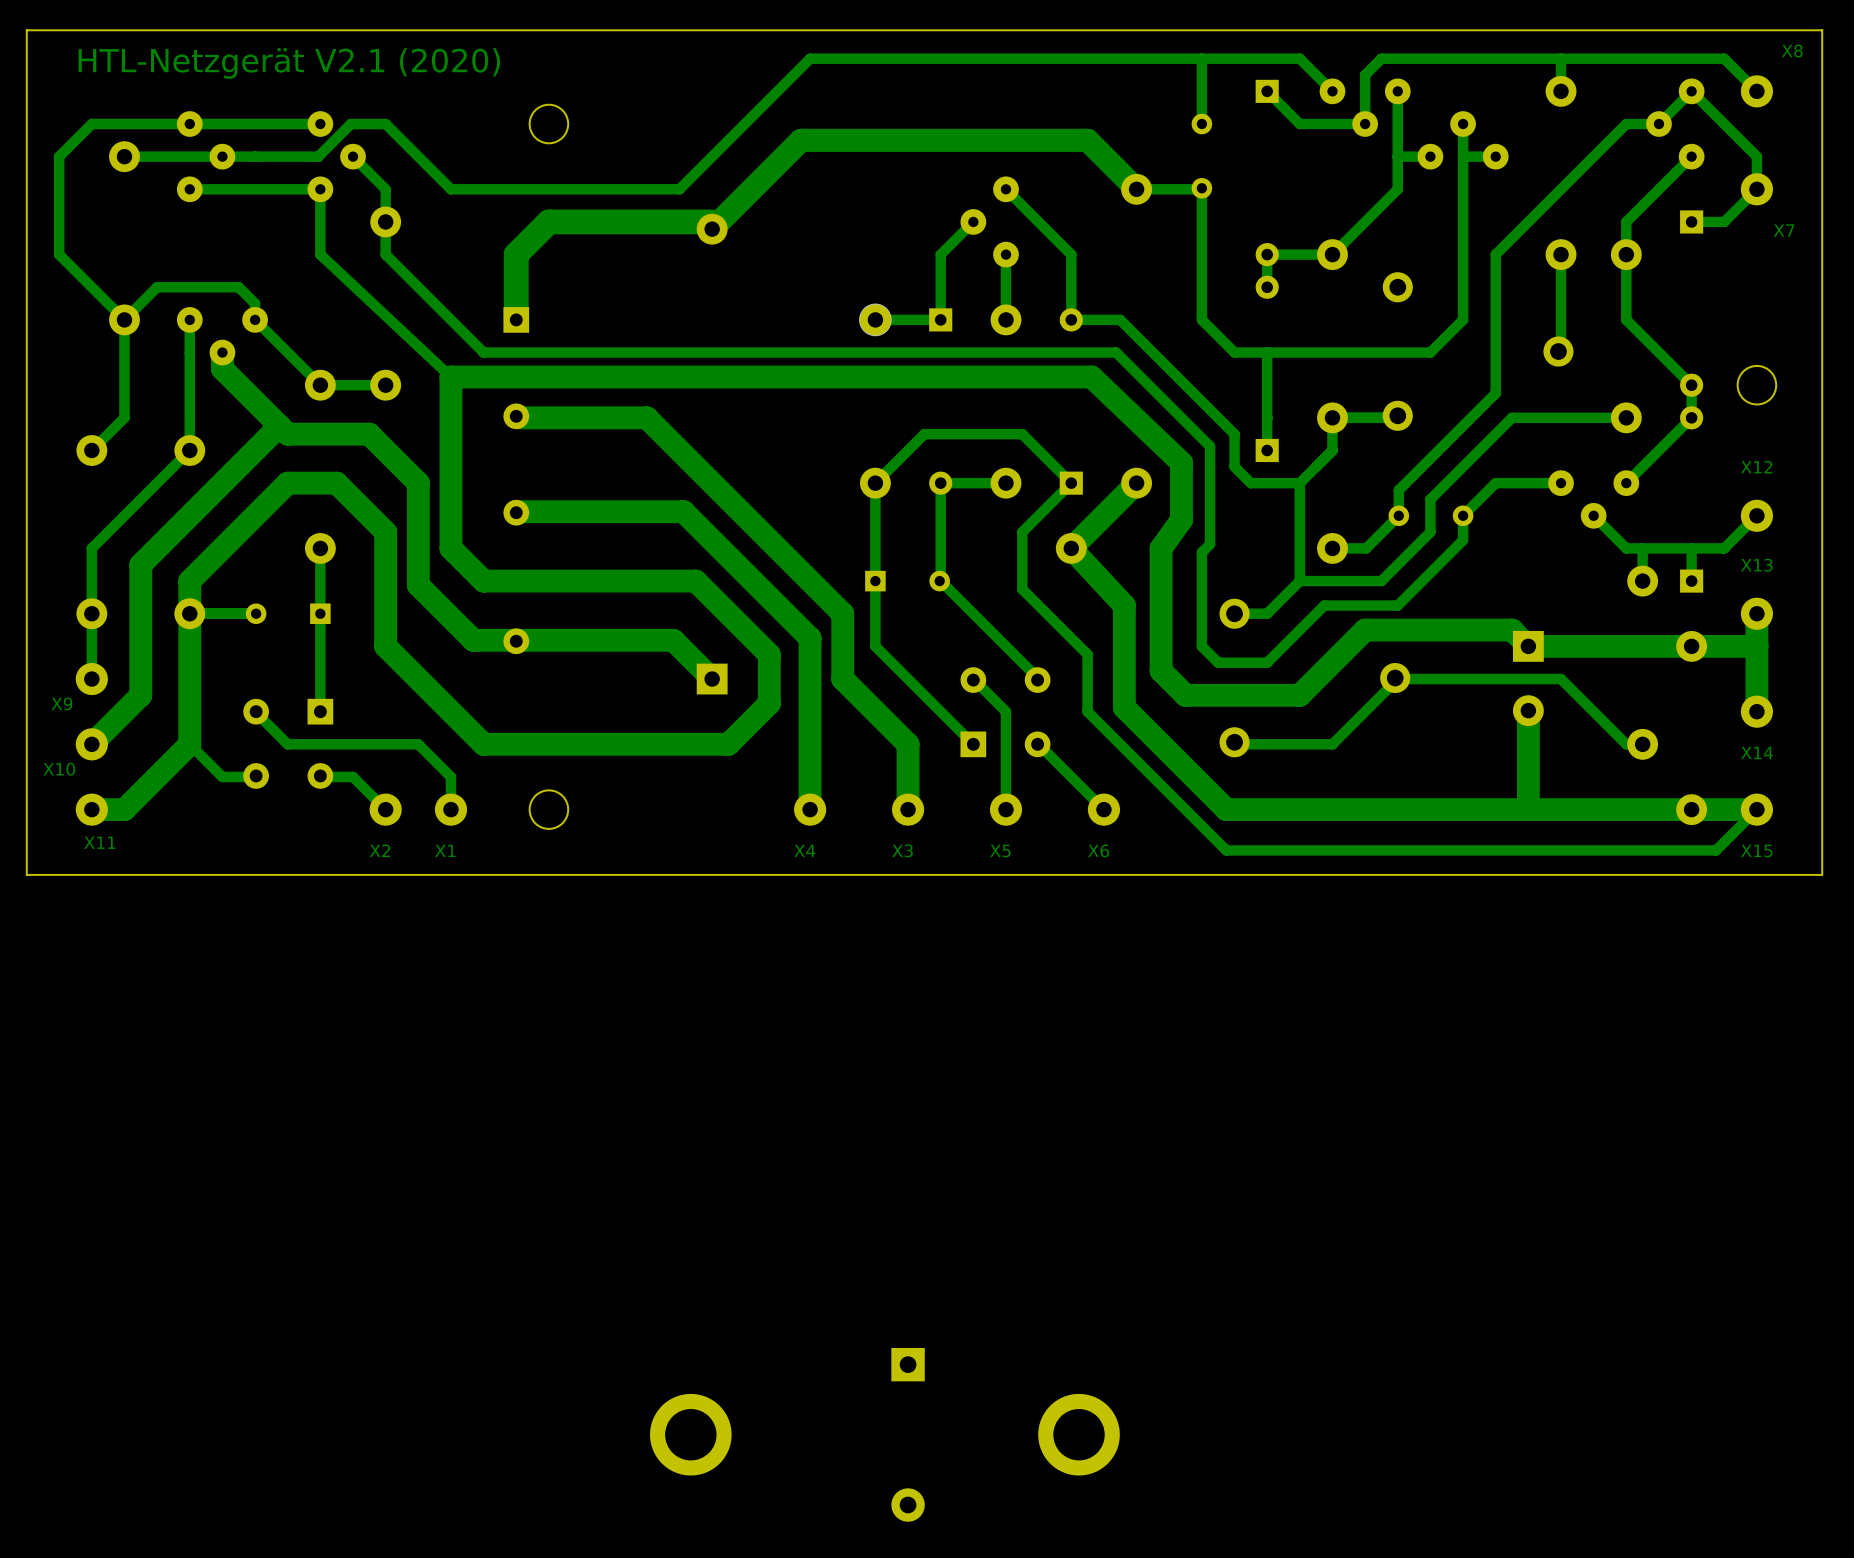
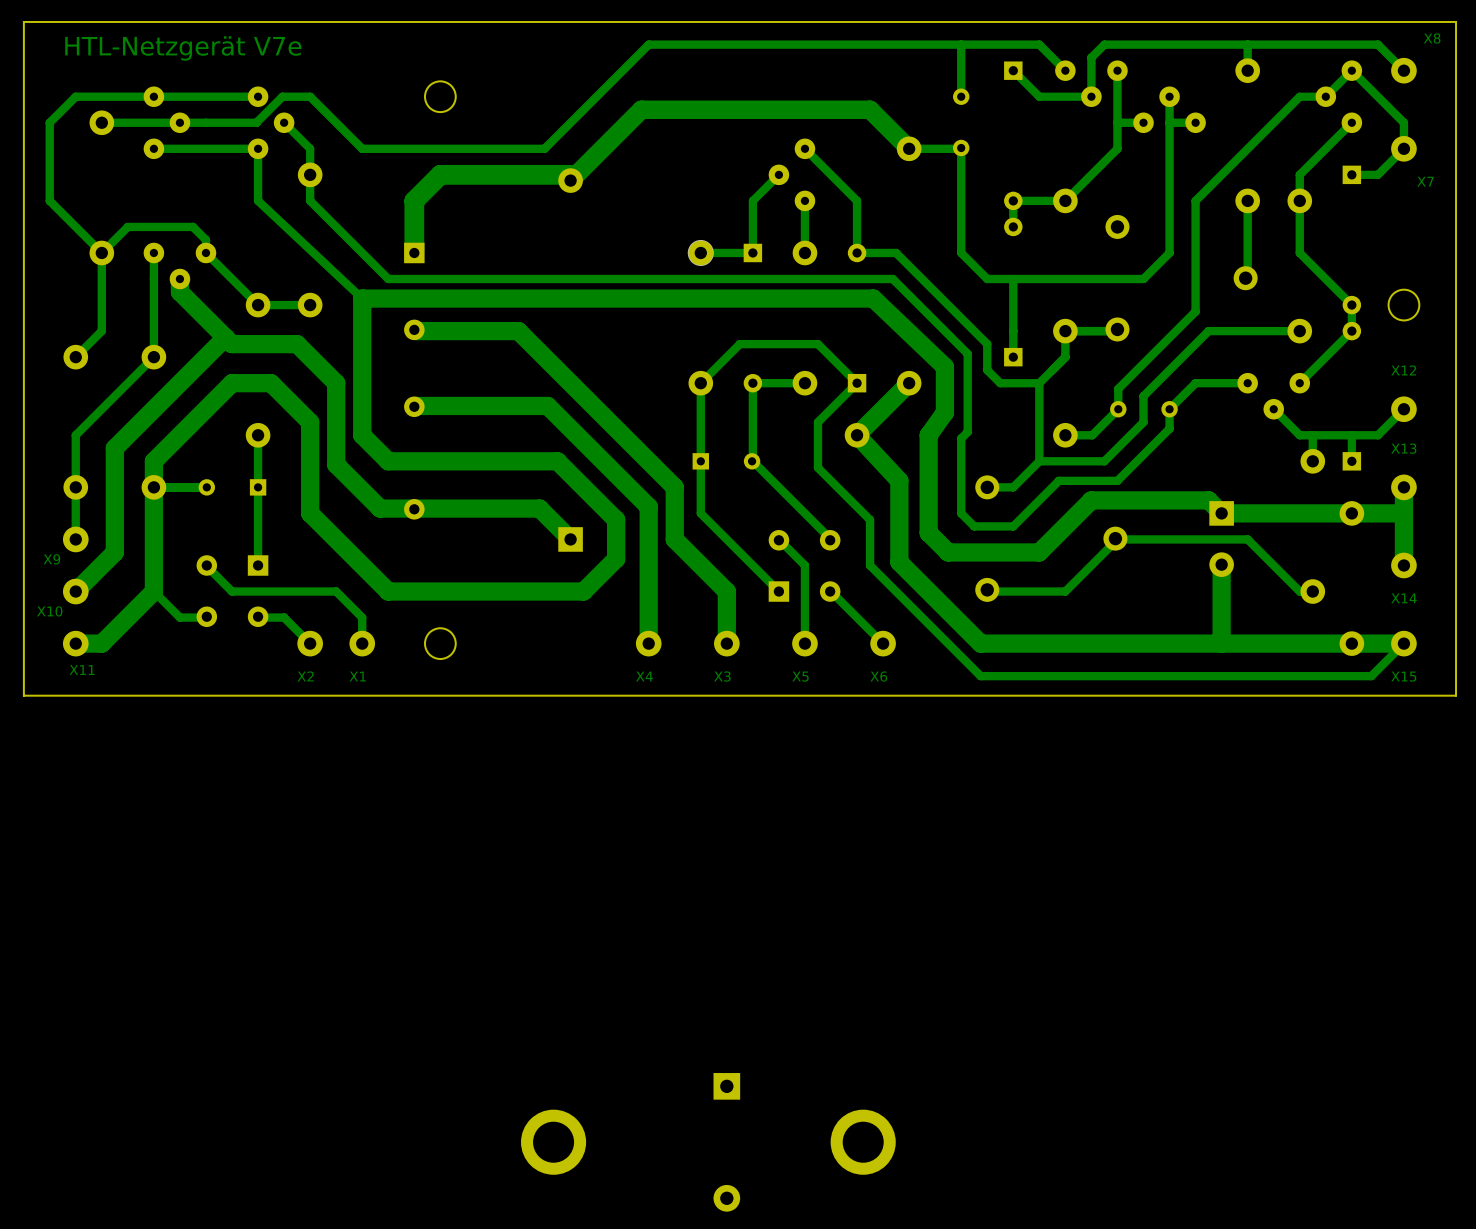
text: HTL-Netzgerät V2.1 (2020) (289, 63) -> HTL-Netzgerät V7e (183, 48)

